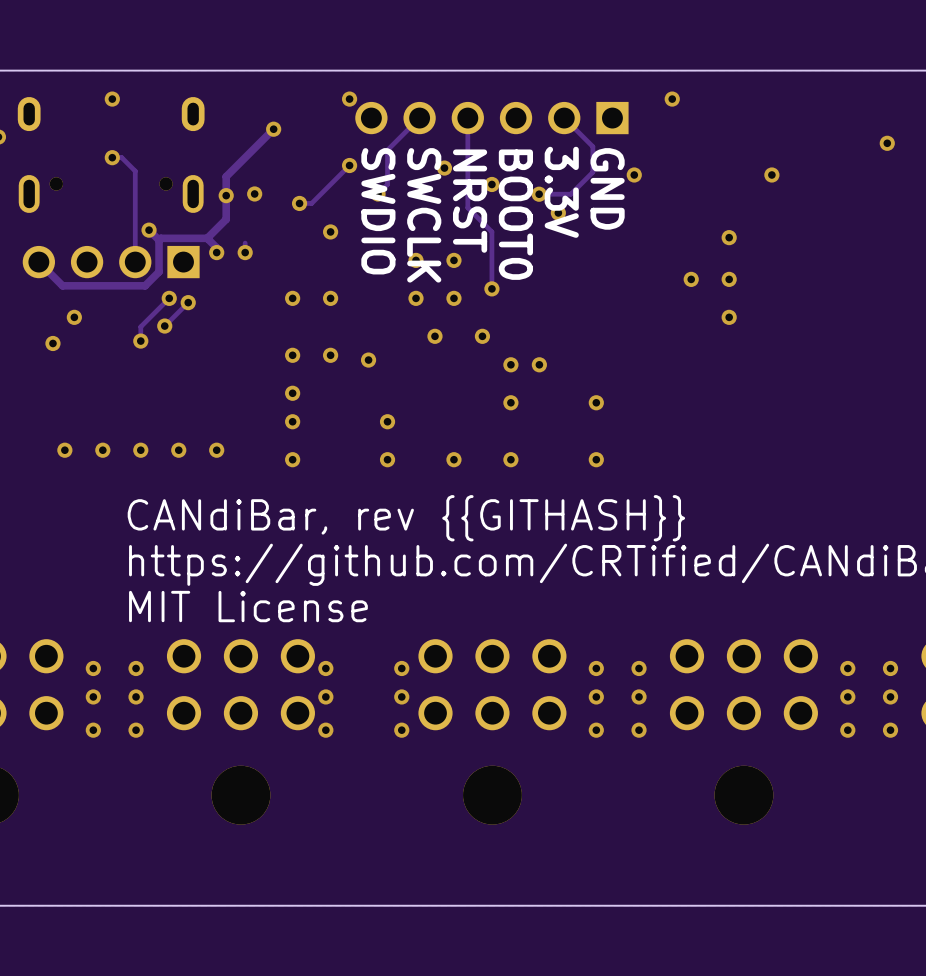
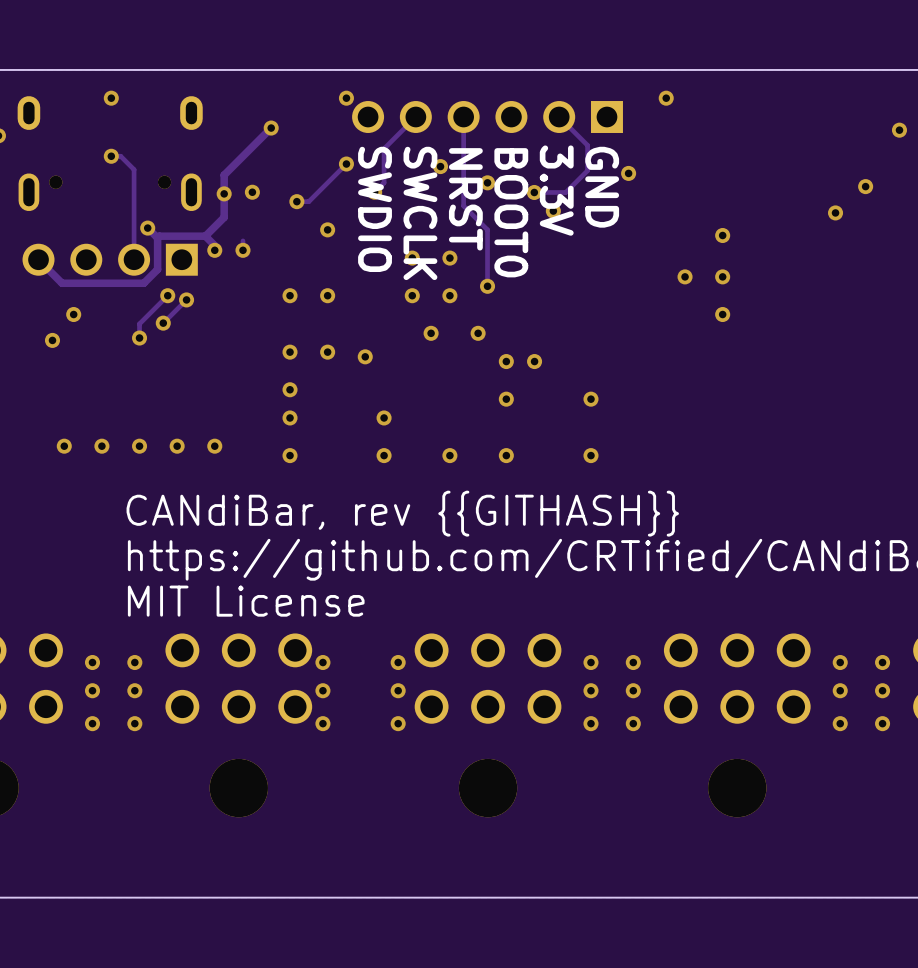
via: none -> (899, 130)
via: (887, 143) -> none
via: (771, 174) -> none
via: none -> (865, 186)
via: none -> (835, 212)

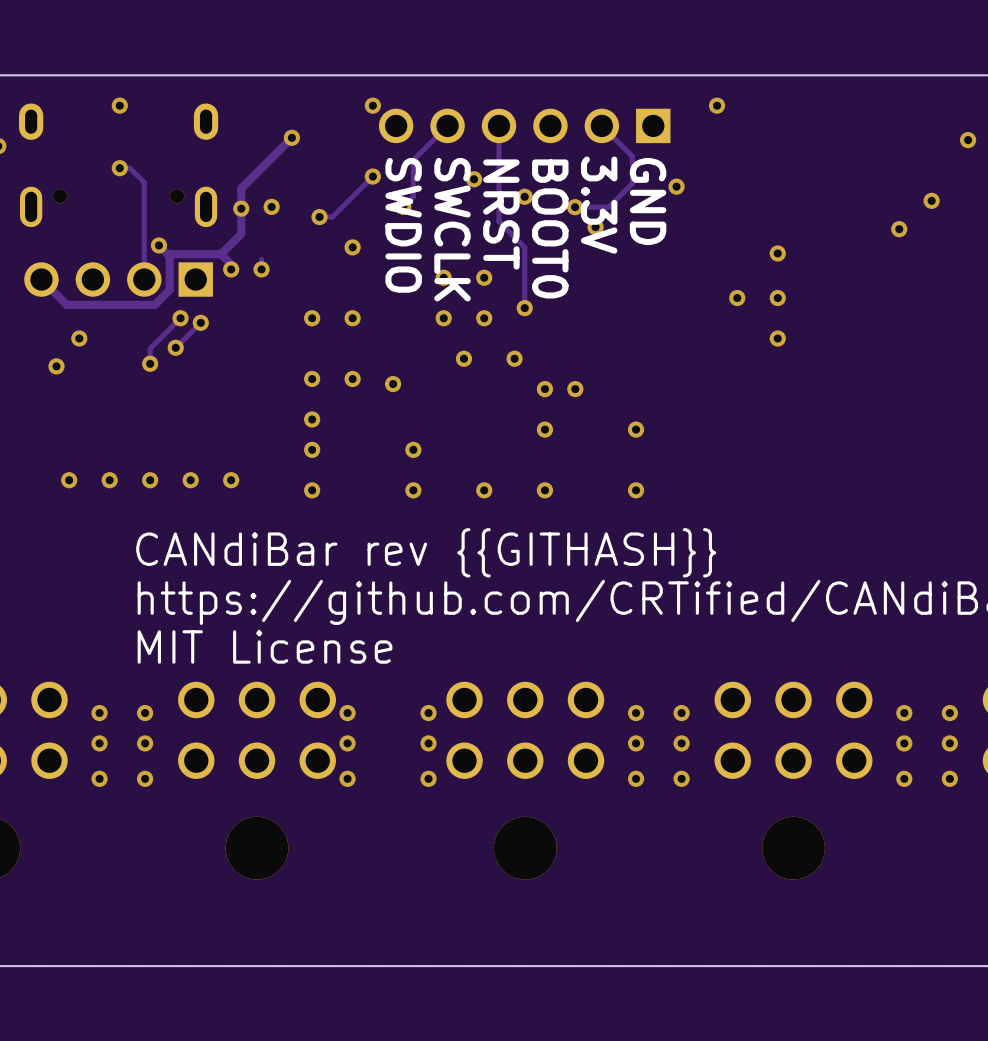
text: CANdiBar, rev {{GITHASH}} (402, 513) -> CANdiBar rev {{GITHASH}} (426, 552)

